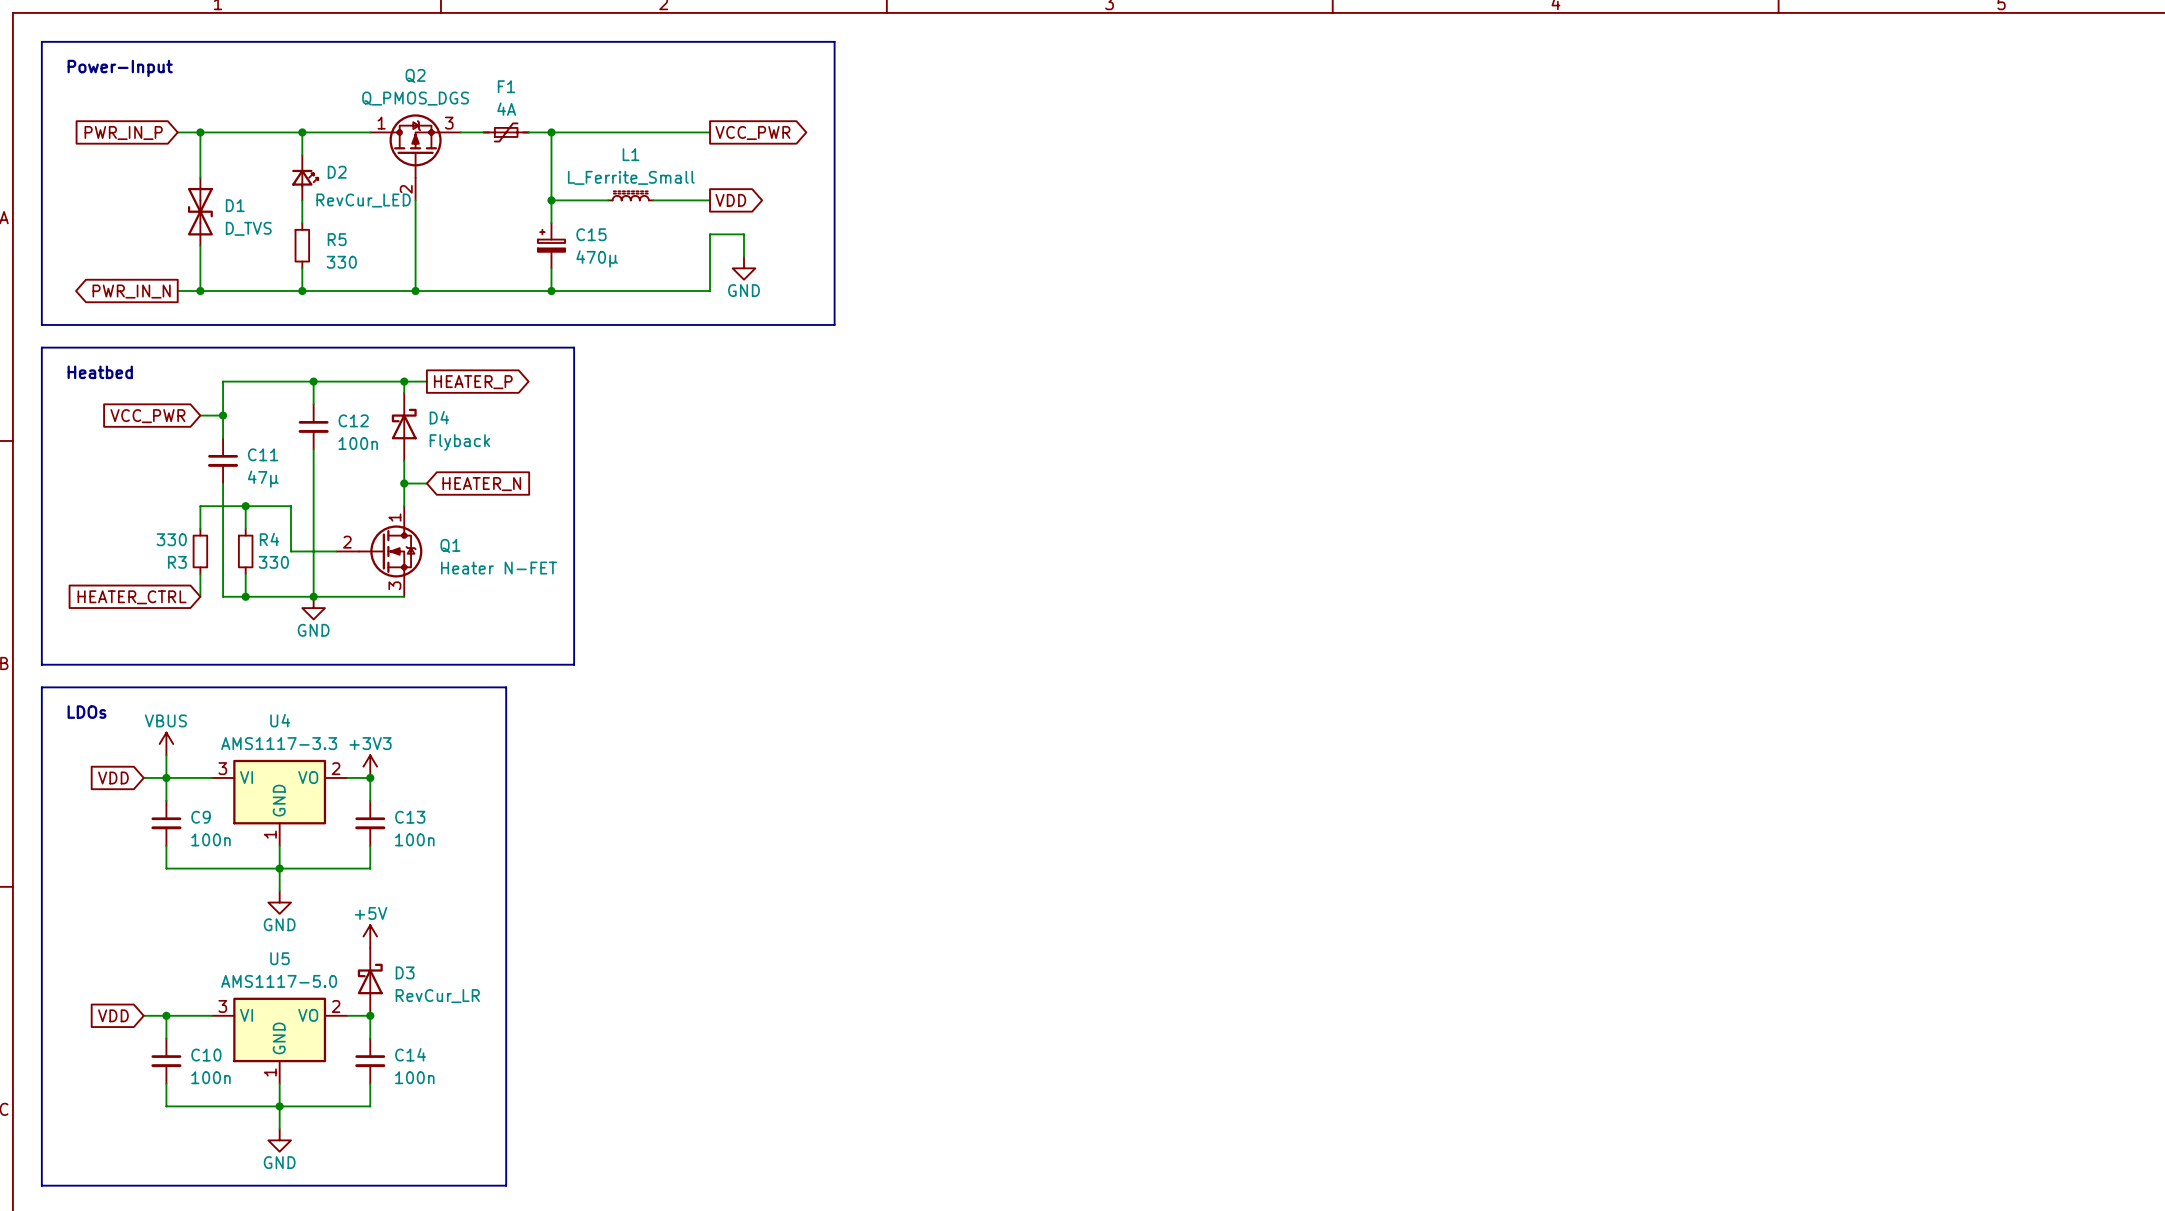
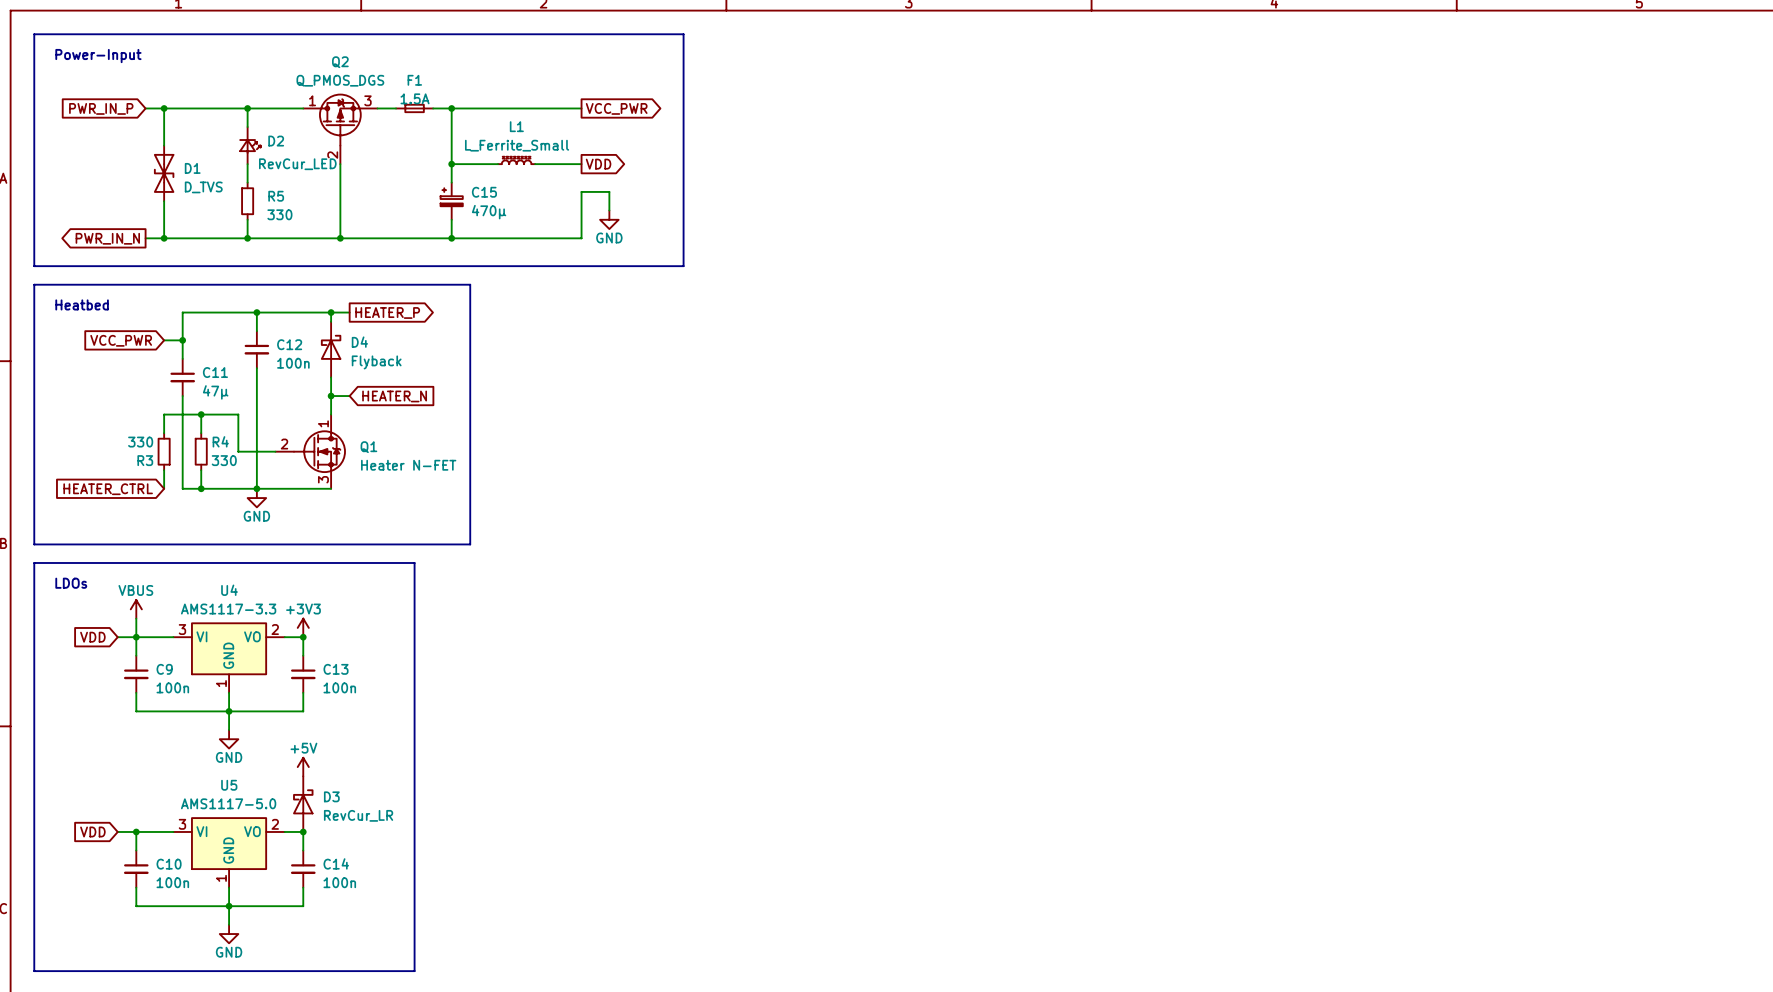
F1 value: 4A (506, 109) -> 1.5A (415, 98)
F1 symbol: [483, 123, 529, 142] -> [396, 104, 434, 113]

